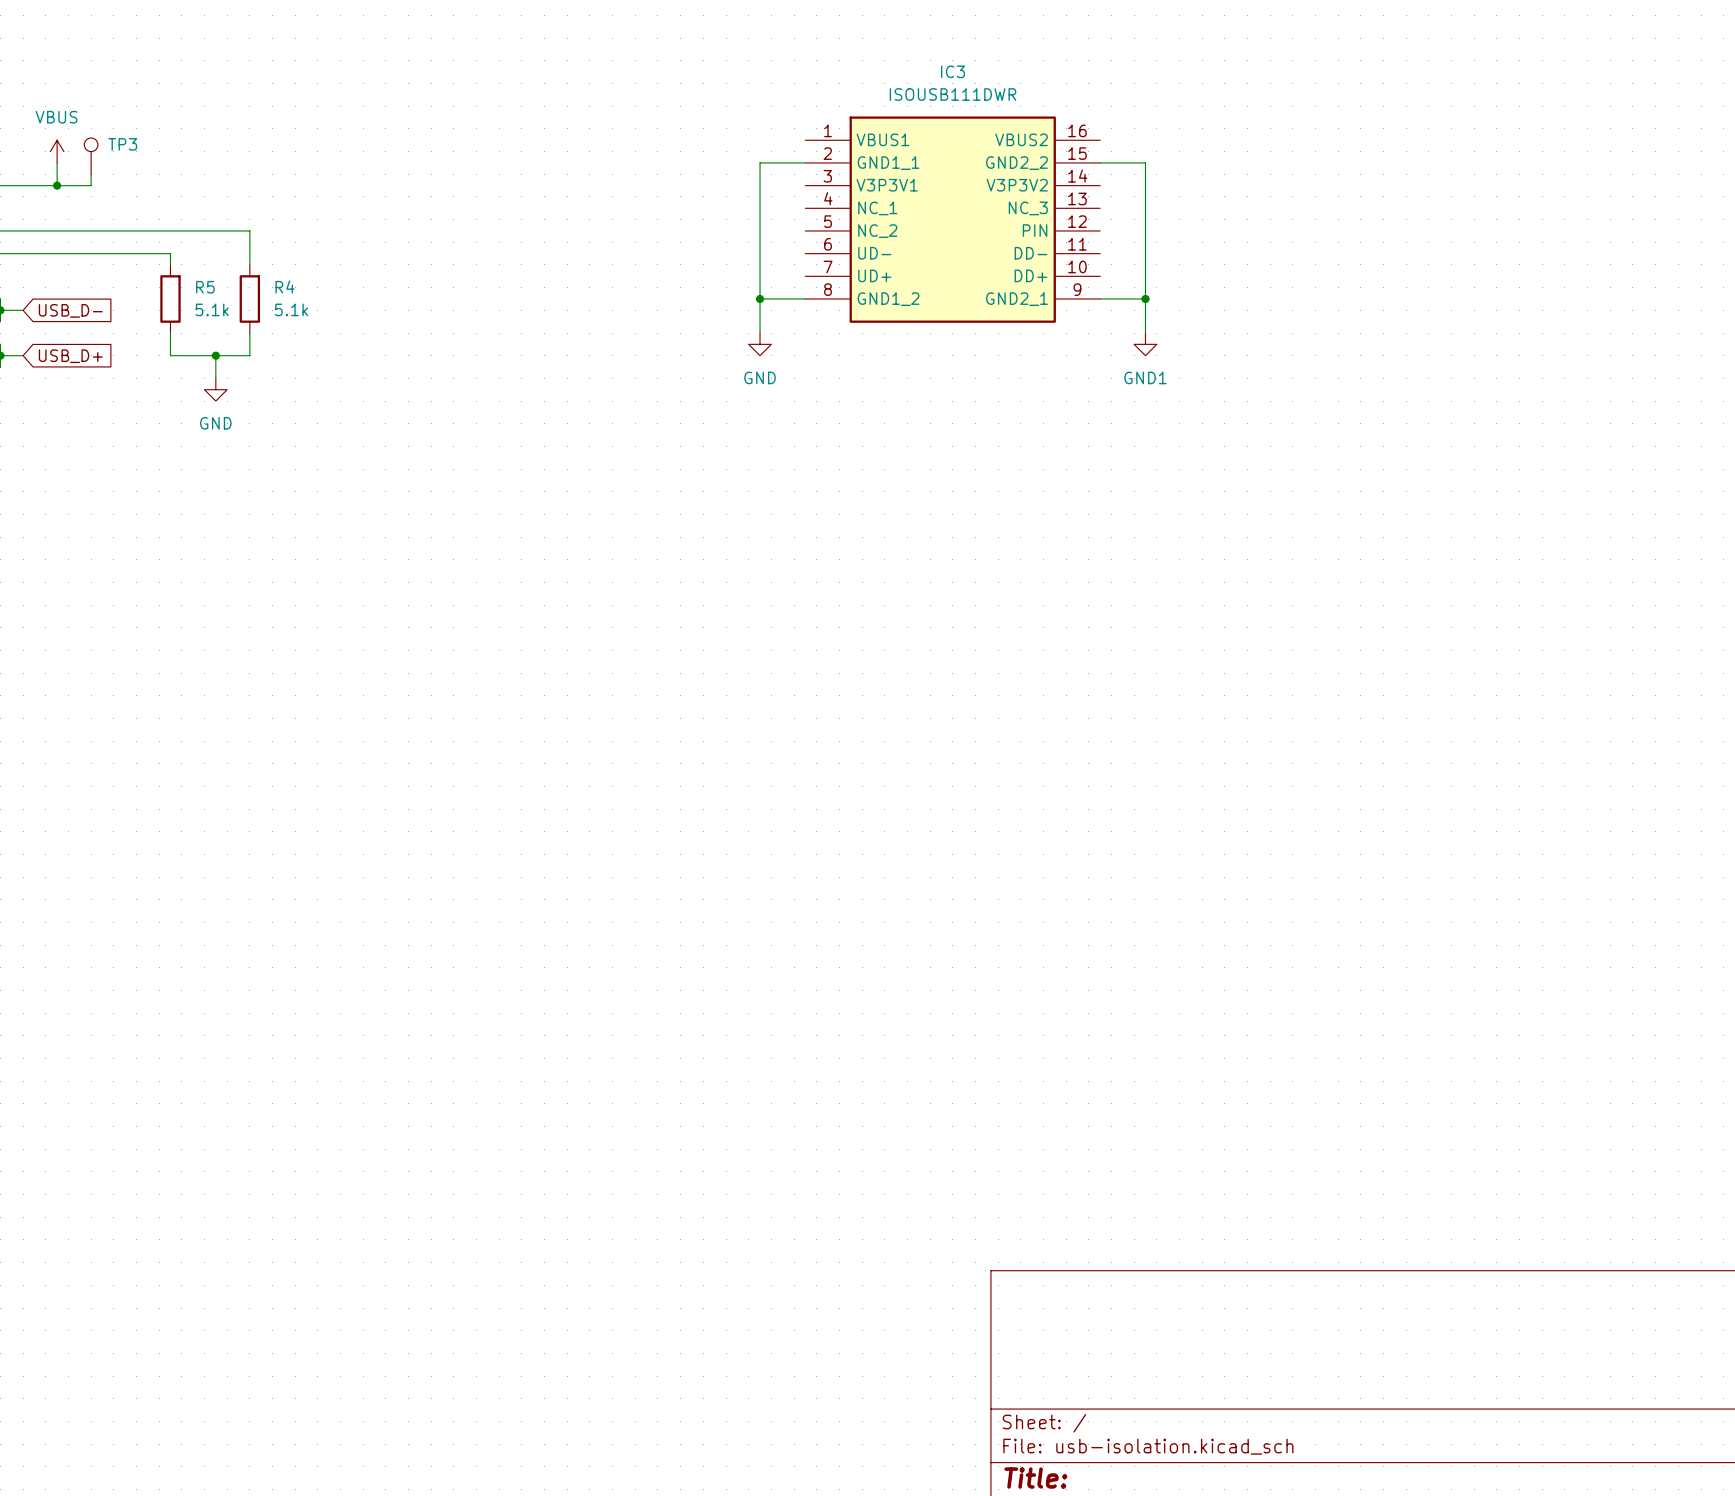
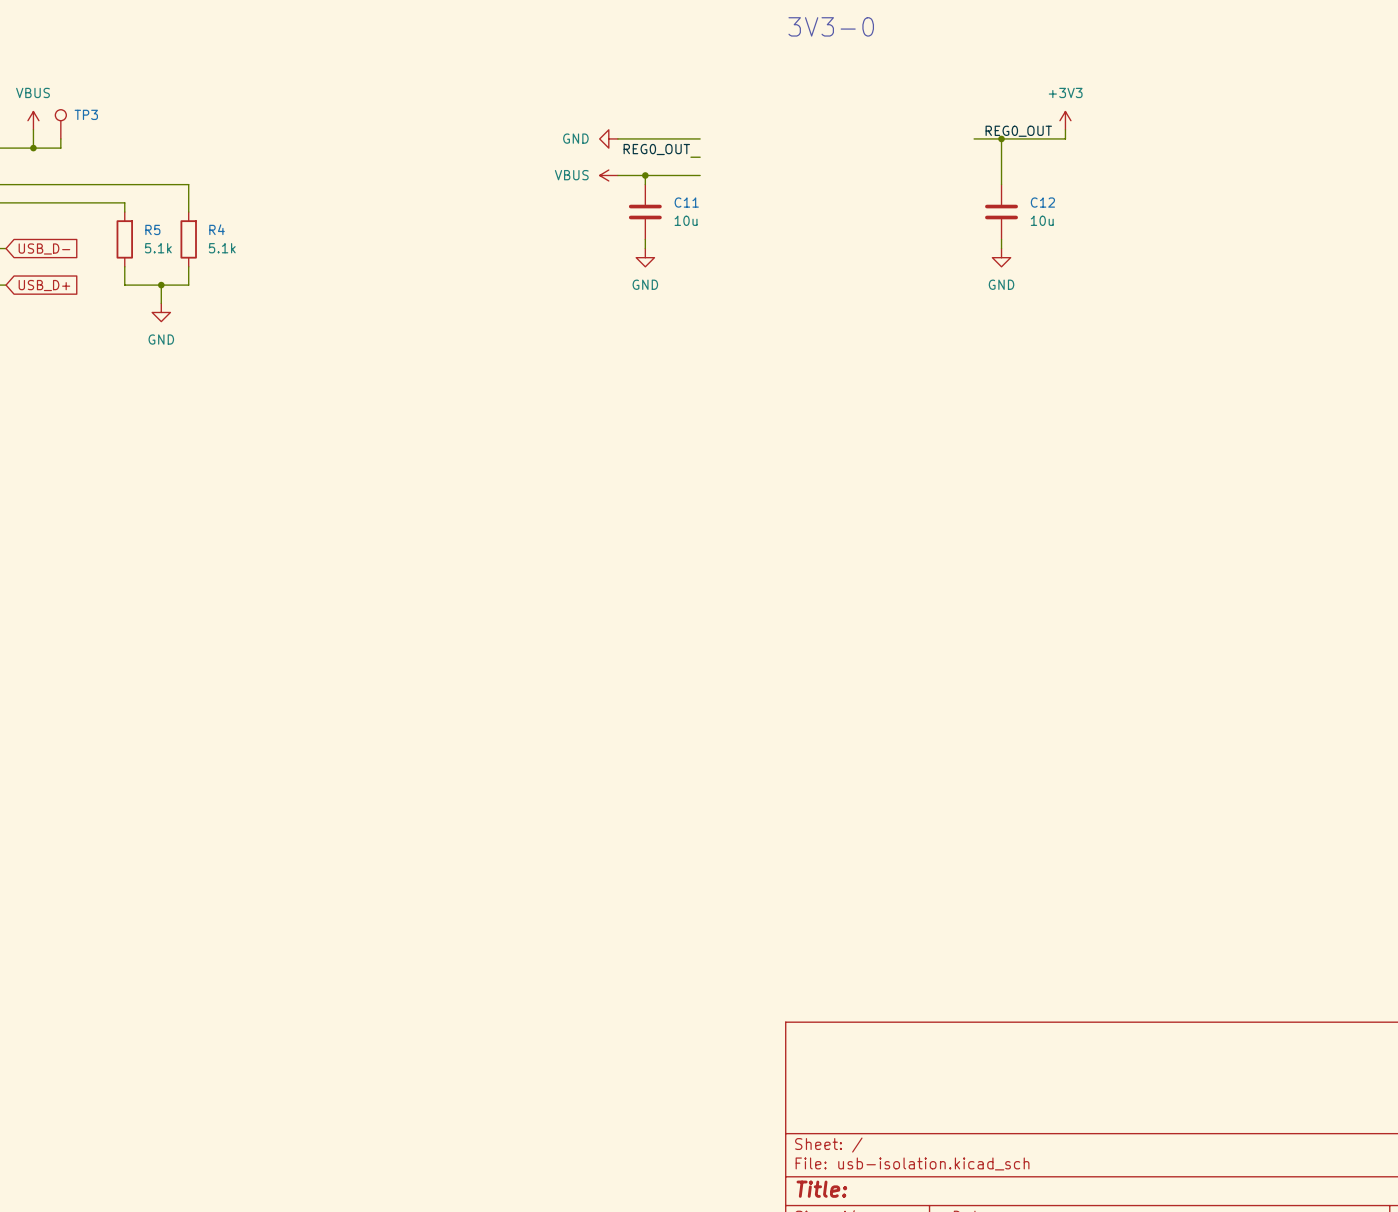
text: none -> 3V3-0 (831, 26)
power symbol: none -> +3V3 (1065, 120)
wire: (805, 162) (760, 162) (760, 333) -> none
wire: (1100, 162) (1145, 162) (1145, 333) -> none
wire: none -> (1065, 129) (1065, 138) (974, 138)
label: none -> REG0_OUT (1018, 131)
power symbol: none -> GND (608, 138)
wire: none -> (617, 138) (700, 138)
wire: none -> (1001, 138) (1001, 184)
junction: none -> (1001, 138)
label: none -> REG0_OUT (656, 149)
power symbol: none -> VBUS (608, 175)
wire: none -> (617, 175) (700, 175)
wire: none -> (645, 175) (645, 184)
junction: none -> (645, 175)
IC3: ISOUSB111DWR (952, 219) -> none
C11: none -> 10u (645, 212)
C12: none -> 10u (1001, 212)
wire: (760, 299) (805, 299) -> none
junction: (760, 299) -> none
wire: none -> (645, 239) (645, 248)
wire: (1100, 299) (1145, 299) -> none
junction: (1145, 299) -> none
wire: none -> (1001, 239) (1001, 248)
power symbol: none -> GND (1001, 257)
power symbol position: GND (760, 344) -> GND (645, 257)
power symbol: GND1 (1145, 344) -> none

